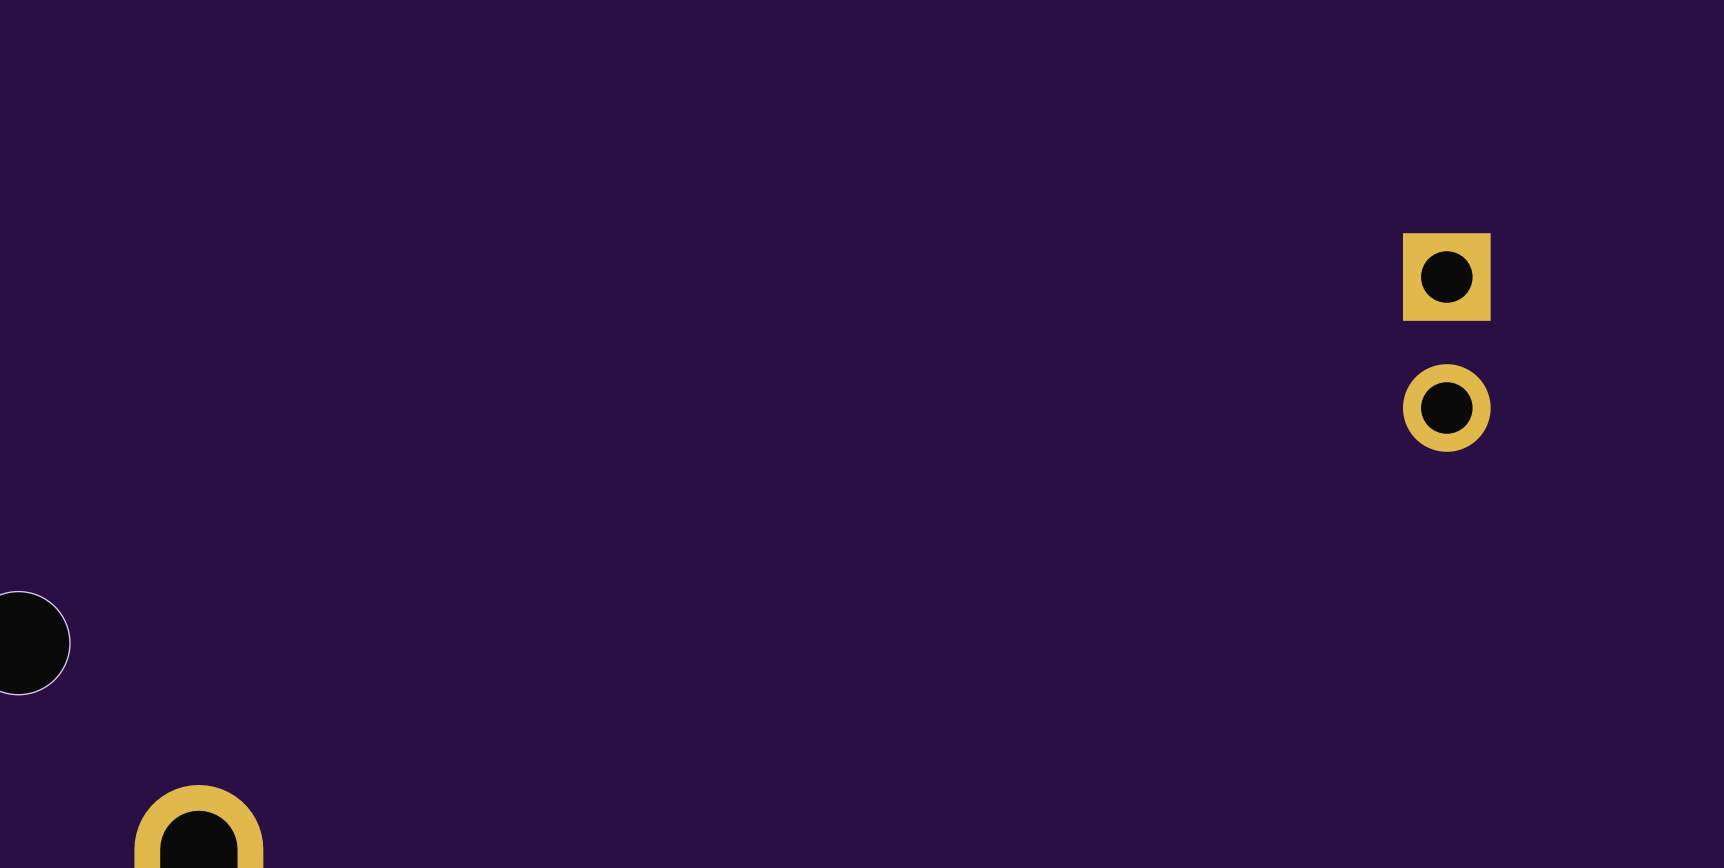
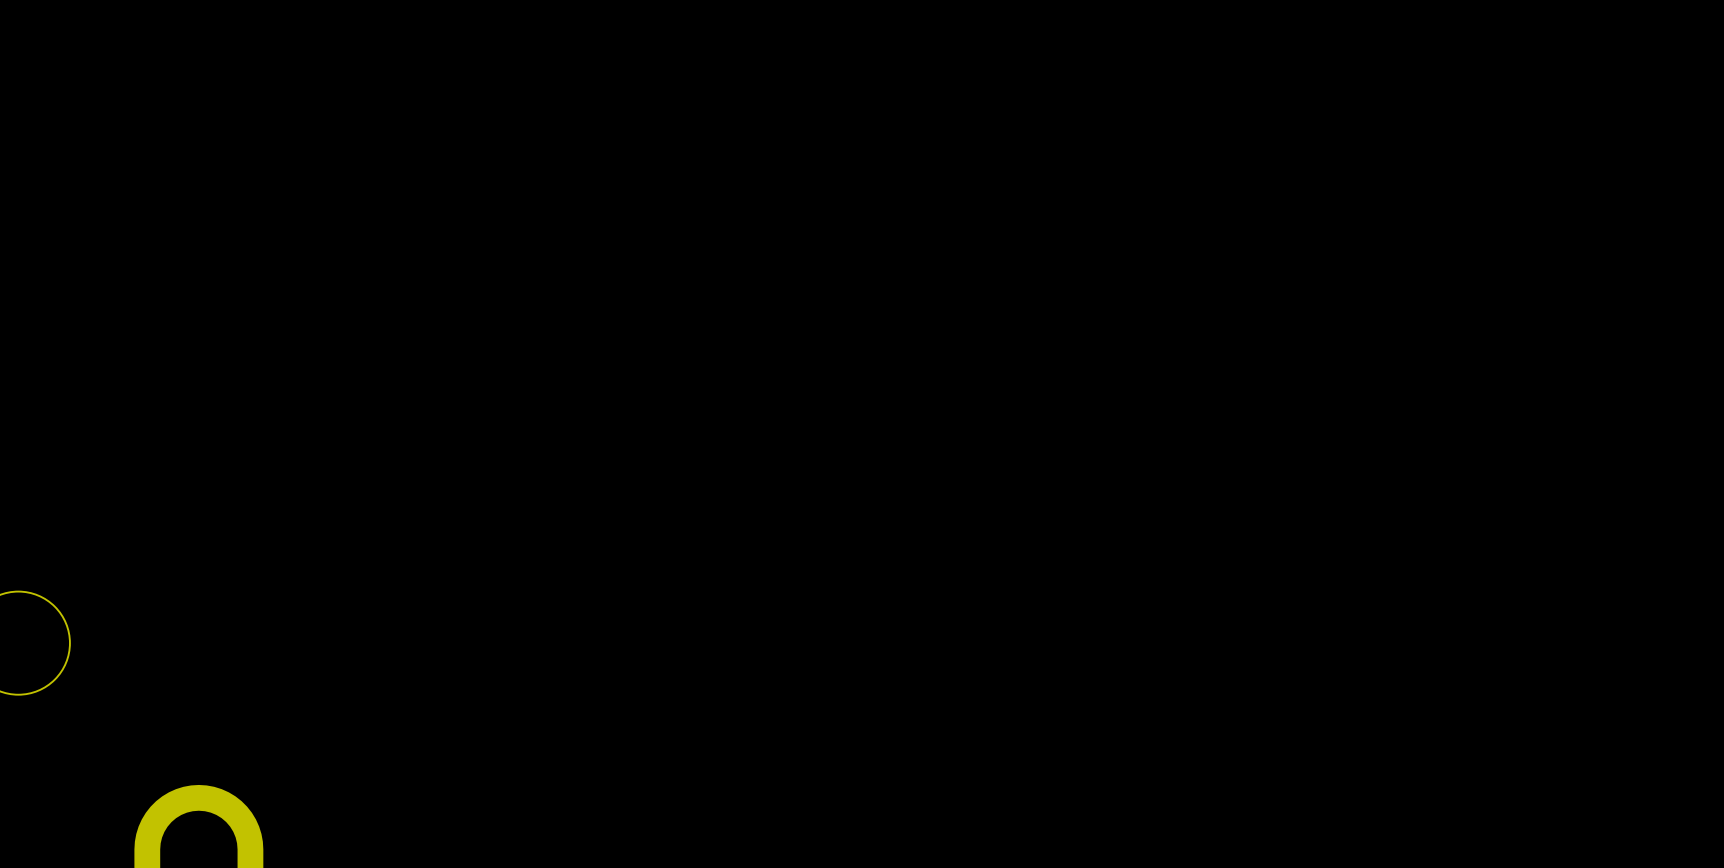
part: (1446, 342) -> none

